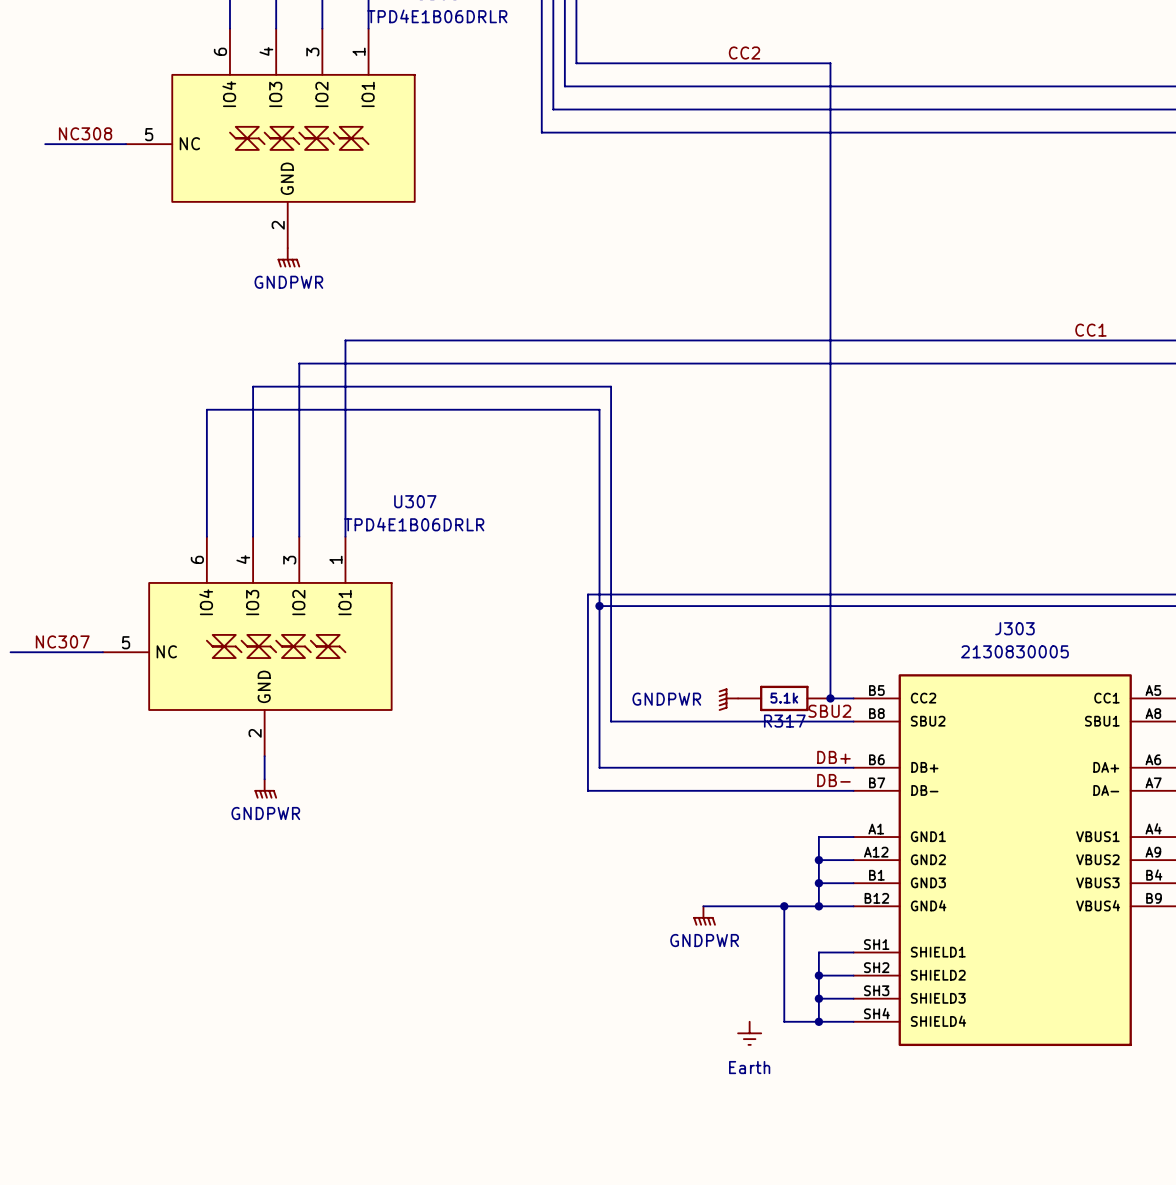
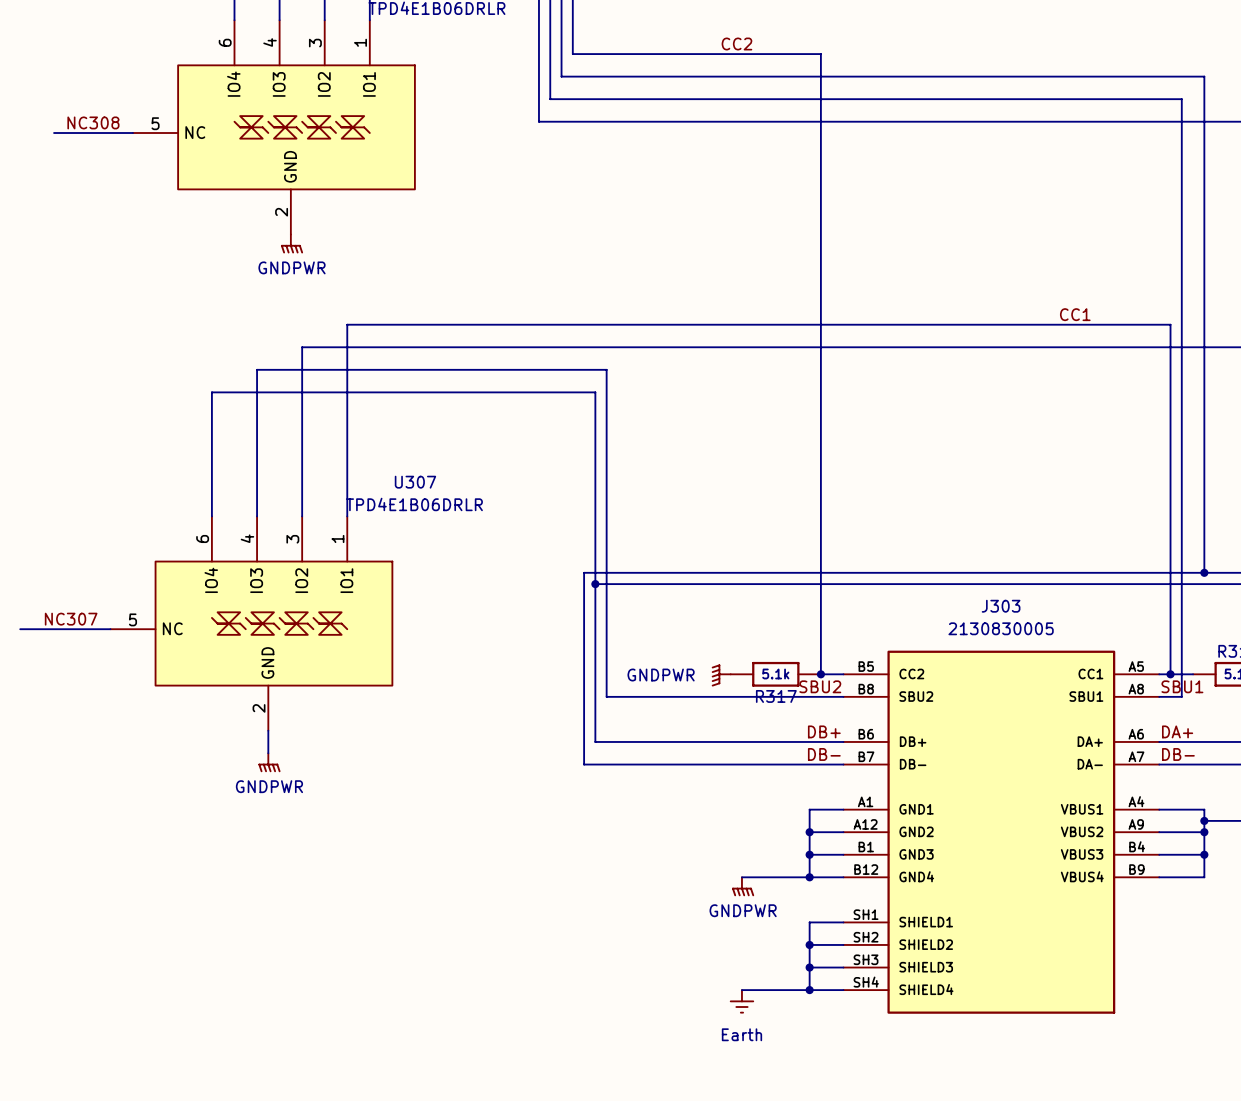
wire: (703, 906) (749, 906) -> none
wire: (784, 906) (784, 1021) -> (741, 990) (775, 990)
junction: (784, 906) -> none
power symbol position: GNDPWR (704, 916) -> GNDPWR (743, 886)

